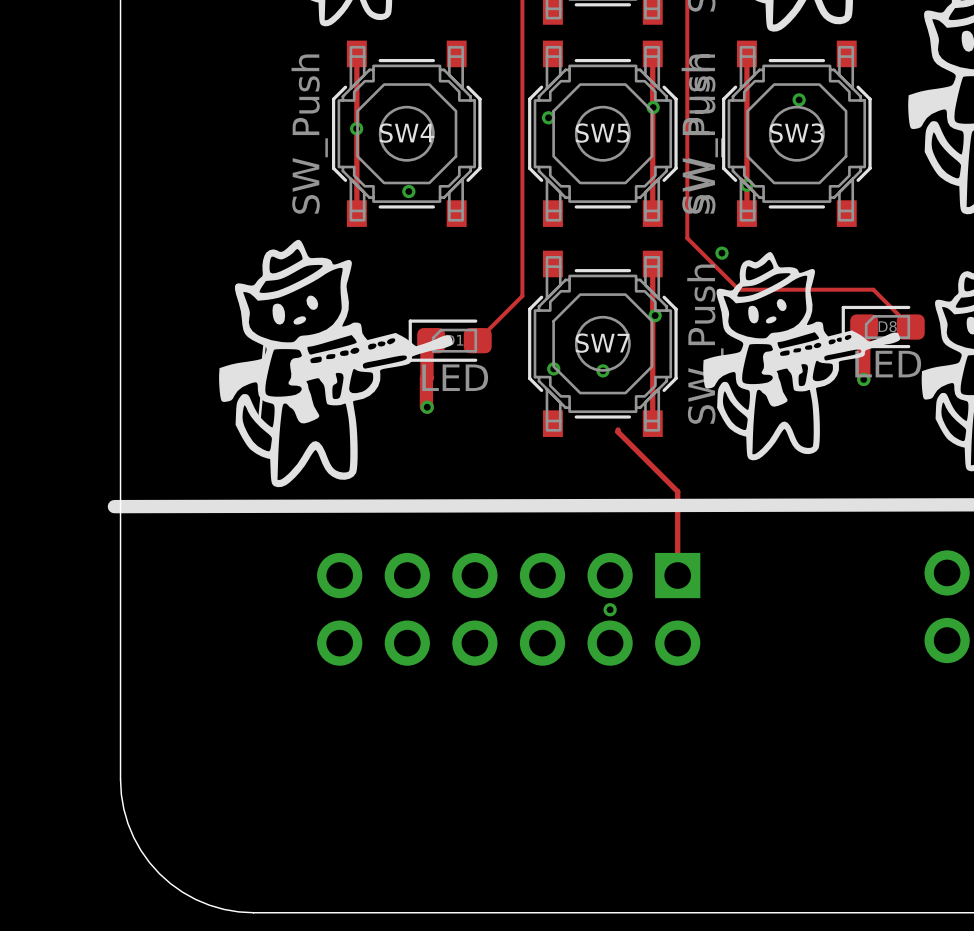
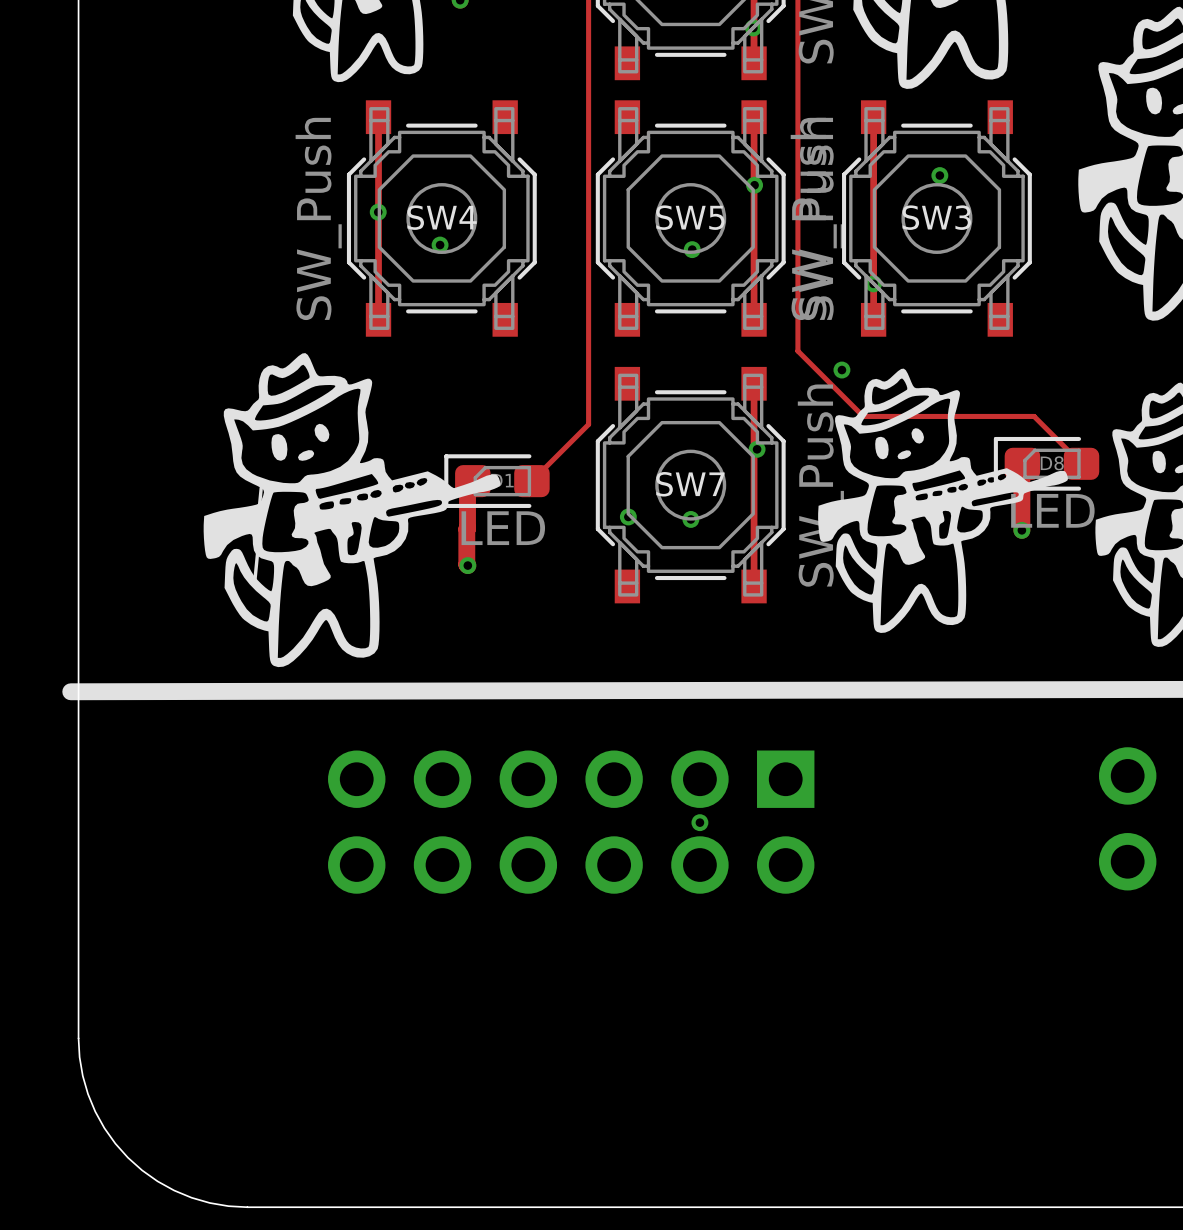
via position: (548, 117) -> (692, 249)
via position: (408, 191) -> (440, 245)
track: (618, 429) (677, 491) (677, 575) -> none

